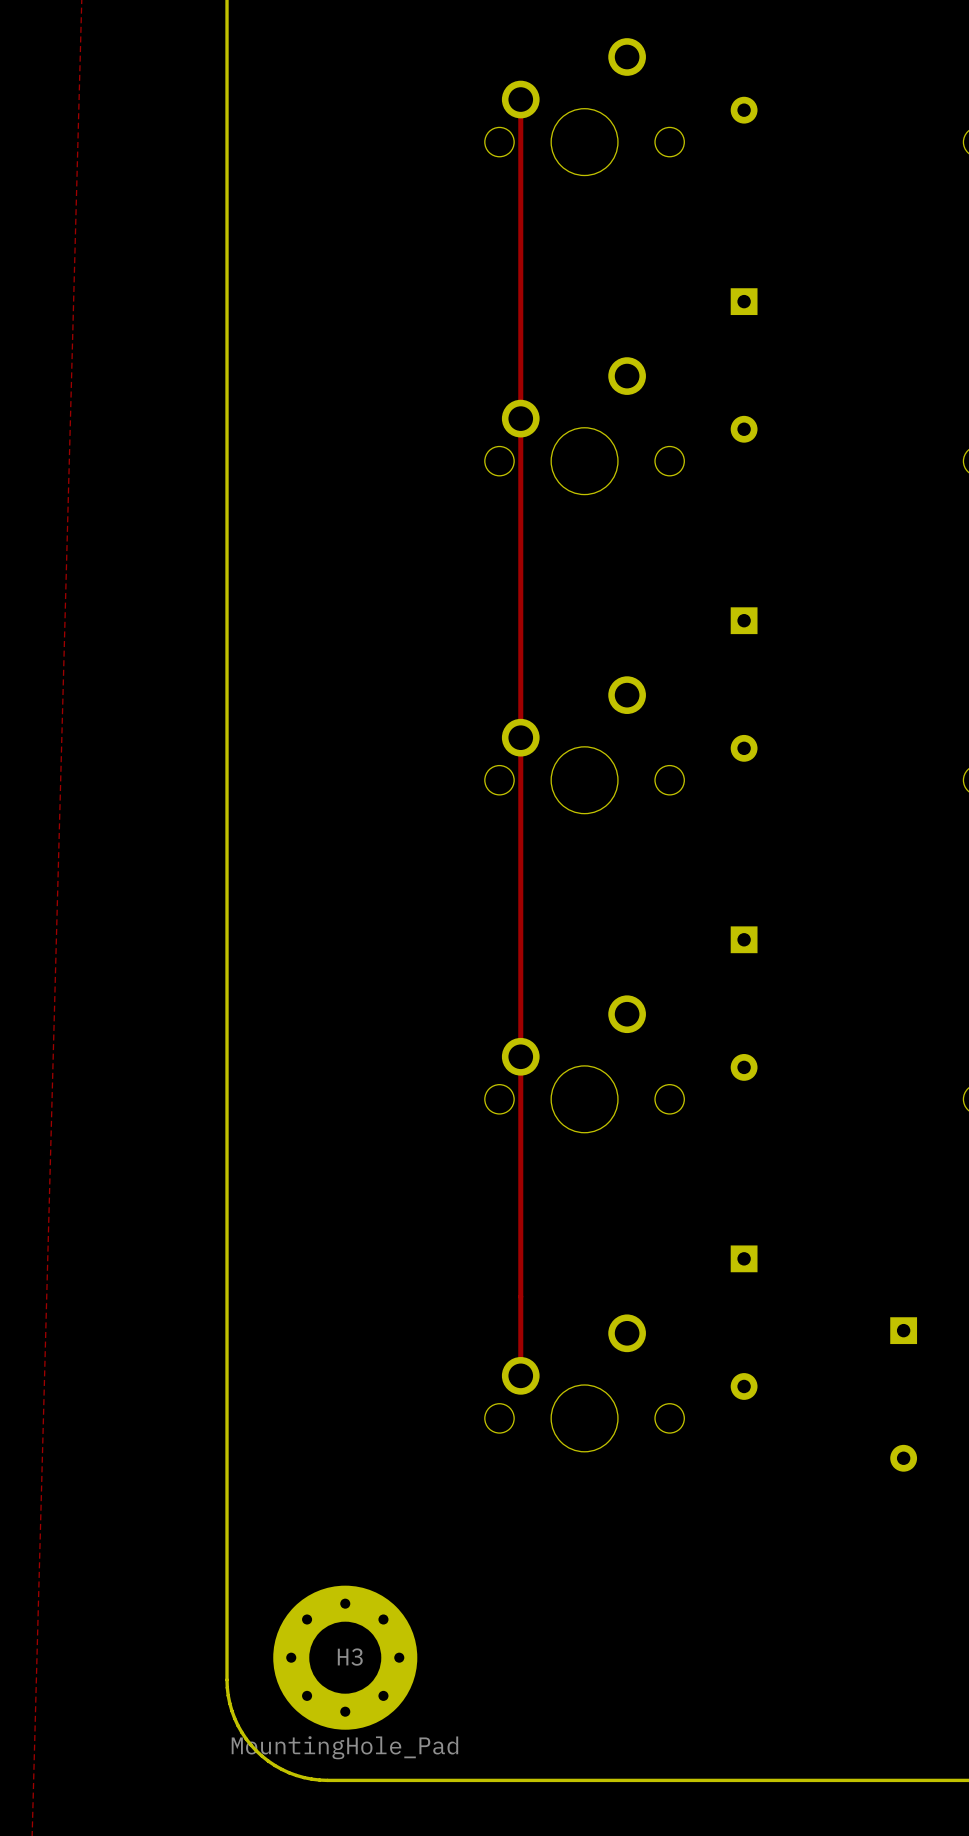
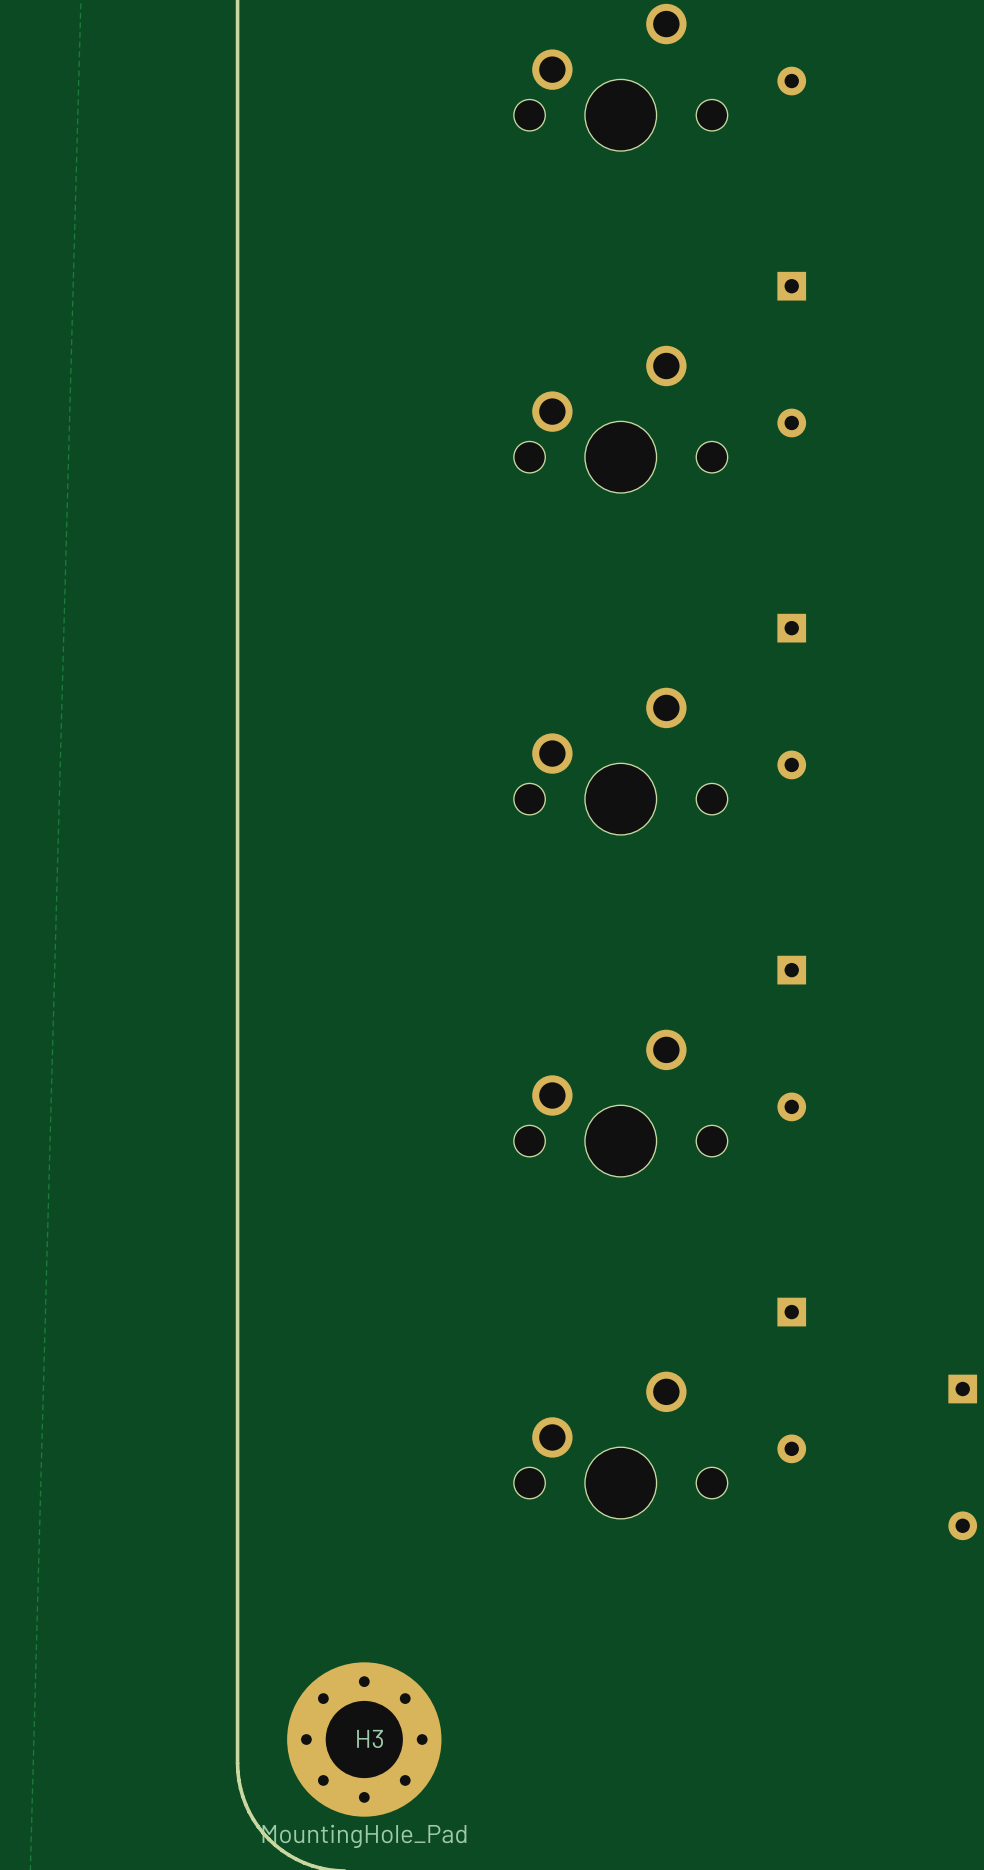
track: (520, 99) (520, 1375) -> none

